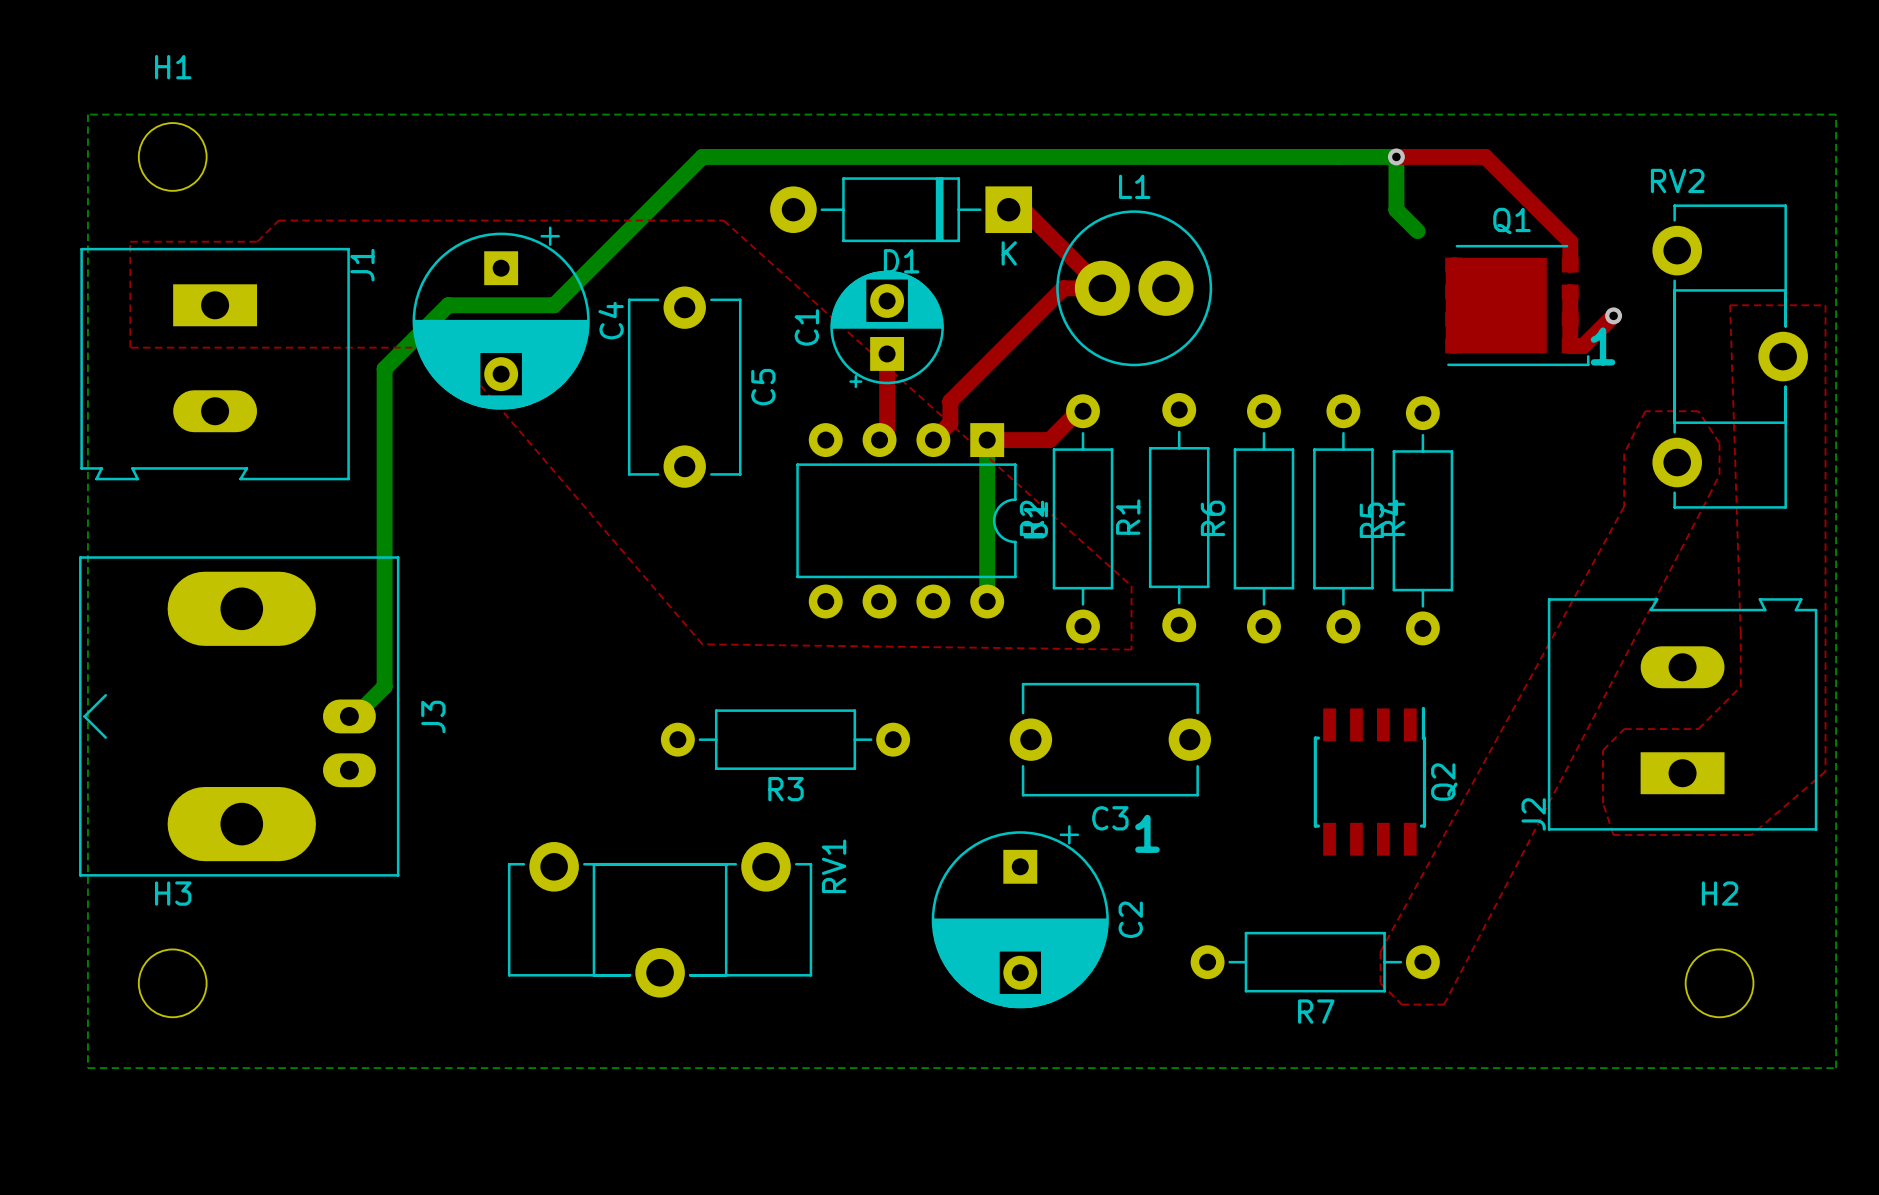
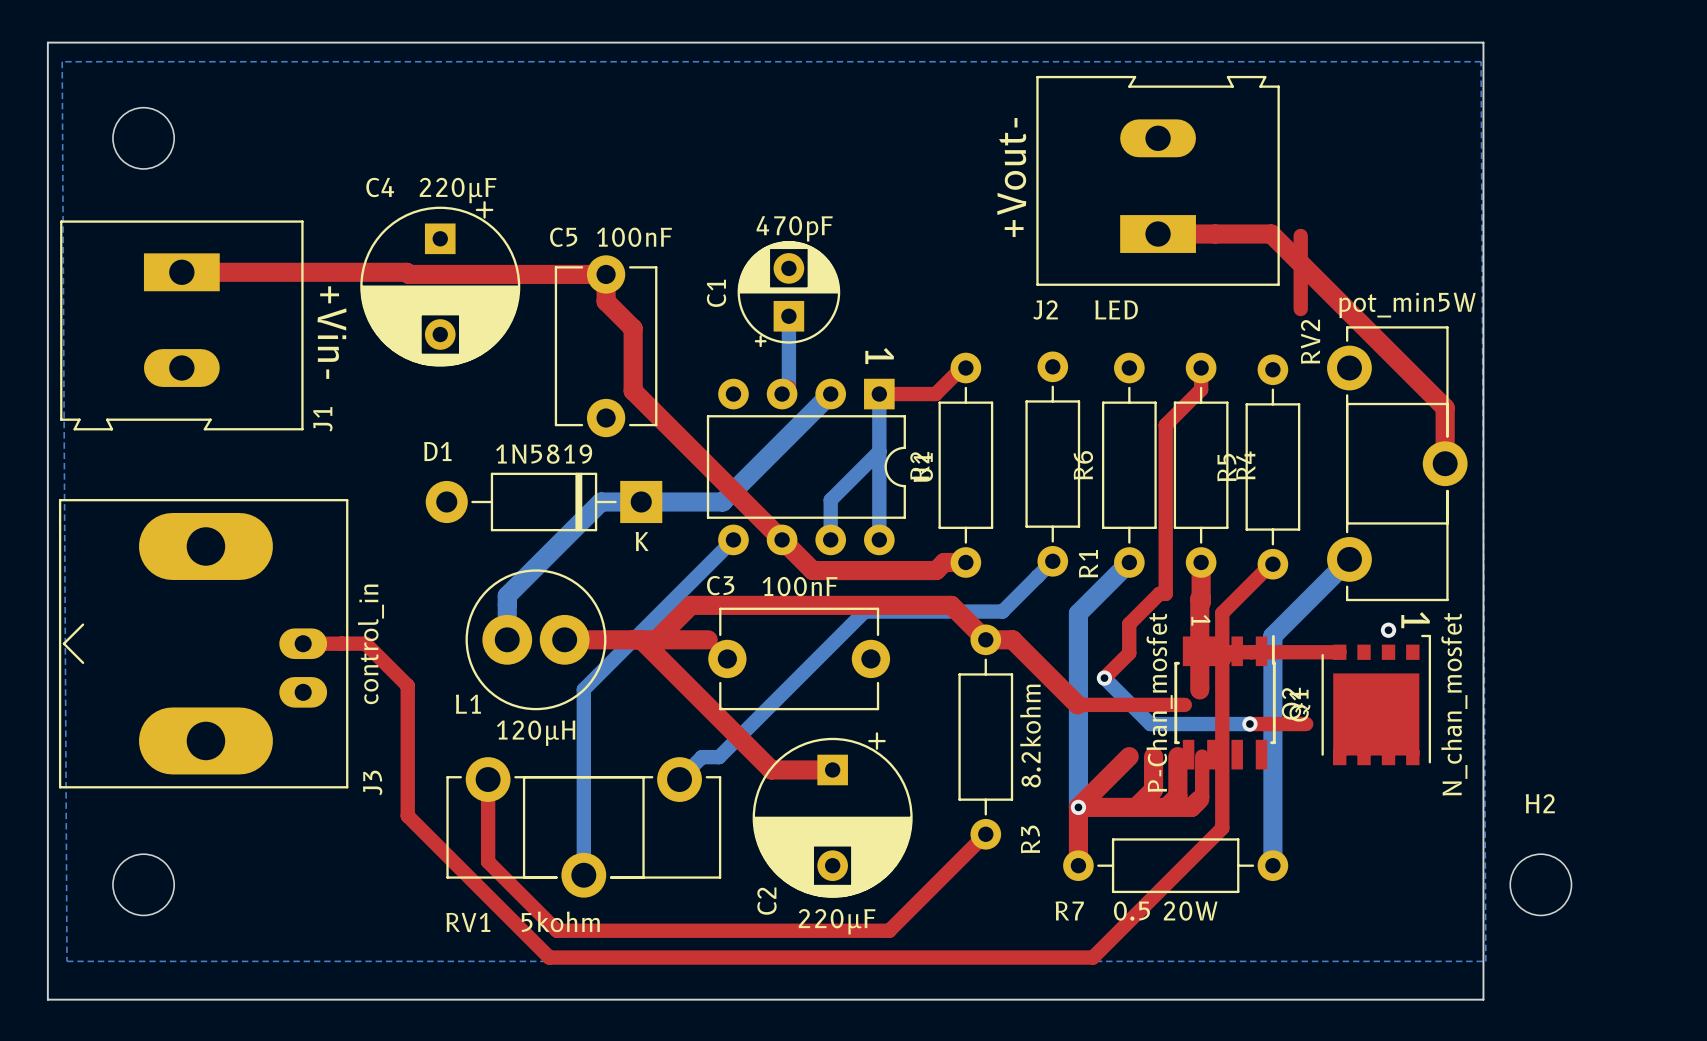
board edge: none -> (47, 42) (47, 999) (1483, 999) (1483, 42) (47, 42)
H1 name: H1 (173, 67) -> none
top track: (1396, 156) (1485, 156) (1570, 241) (1570, 265) -> none
via: (1396, 156) -> none
RV2 name rotation: 0° (1677, 180) -> 90° counterclockwise (1310, 341)
L1 name position: L1 (1134, 186) -> L1 (468, 704)
text: none -> +Vout- (1011, 177)
D1 position: (901, 209) -> (544, 501)
top track: (1008, 209) (1023, 209) (1102, 288) (1063, 288) (950, 401) (950, 423) (933, 440) -> none
C4 value: none -> 220µF (458, 190)
top zone outline: (278, 220) (257, 241) (130, 241) (130, 347) (448, 347) (702, 644) (1131, 649) (1131, 586) (723, 220) (278, 220) -> none
bottom track: (1417, 231) (1396, 209) (1396, 156) (702, 156) (554, 305) (448, 305) (384, 368) (384, 686) (354, 716) -> none
C1 value: none -> 470pF (794, 228)
D1 name position: D1 (901, 261) -> D1 (437, 451)
top track: none -> (1158, 234) (1271, 234) (1445, 407) (1445, 463)
J1 name position: J1 (362, 265) -> J1 (322, 419)
C5 value: none -> 100nF (634, 237)
L1 position: (1134, 288) -> (535, 639)
top track: (1570, 291) (1570, 345) (1583, 345) (1613, 315) -> none
top track: none -> (181, 272) (606, 274) (606, 301) (633, 328) (633, 390) (812, 570) (936, 570) (944, 562) (965, 562)
Q1 rotation: 0° (1517, 305) -> 90° counterclockwise (1376, 700)
Q1 position: (1517, 305) -> (1376, 700)
top zone outline: (1730, 305) (1825, 305) (1825, 771) (1751, 835) (1613, 835) (1603, 803) (1603, 750) (1624, 729) (1698, 729) (1740, 686) (1730, 305) -> none
via: (1613, 315) -> none
C4 name rotation: 0° (611, 320) -> 90° clockwise (380, 187)
C4 name position: C4 (611, 320) -> C4 (380, 187)
RV2 value: none -> pot_min5W (1407, 305)
J2 value: none -> LED (1116, 309)
text: 1 (1603, 346) -> none
top track: (887, 353) (887, 432) -> none
bottom track: none -> (788, 316) (788, 387)
RV2 position: (1730, 356) -> (1397, 463)
text: none -> +Vin- (332, 332)
C5 name rotation: 0° (763, 387) -> 90° clockwise (563, 237)
C5 name position: C5 (763, 387) -> C5 (563, 237)
text: none -> 1 (879, 356)
top track: none -> (1201, 368) (1201, 389) (1165, 425) (1165, 593) (1159, 593) (1129, 624) (1129, 653) (1104, 678)
top zone outline: (1645, 411) (1698, 411) (1719, 443) (1719, 474) (1444, 1004) (1401, 1004) (1380, 983) (1380, 951) (1624, 506) (1624, 453) (1645, 411) -> none
bottom track: none -> (830, 394) (722, 501) (601, 501) (507, 595) (507, 639)
bottom track: none -> (879, 451) (830, 500) (830, 539)
D1 value: none -> 1N5819 (544, 454)
R1 name position: R1 (1128, 517) -> R1 (1088, 563)
bottom track: none -> (733, 539) (583, 689) (583, 875)
bottom track: none -> (1349, 559) (1272, 635) (1272, 865)
bottom track: none -> (1052, 561) (1002, 611) (864, 611) (719, 757) (701, 757) (679, 779)
bottom track: none -> (1129, 562) (1078, 613) (1078, 807)
top track: none -> (1272, 562) (1222, 613) (1222, 828) (1092, 957) (549, 957) (407, 815) (407, 685) (365, 643) (308, 643)
C3 value: none -> 100nF (800, 586)
top track: none -> (1201, 602) (1201, 562) (1199, 689) (1202, 687)
text: none -> 1 (1200, 620)
text: none -> 1 (1415, 620)
via: none -> (1388, 630)
top track: none -> (564, 639) (708, 639) (564, 639)
top track: none -> (641, 639) (771, 769) (832, 769)
top track: none -> (656, 639) (691, 605) (951, 605) (985, 639) (1012, 639) (1077, 704) (1184, 704)
J2 position: (1682, 714) -> (1158, 180)
J3 value: none -> control_in (370, 644)
J3 name position: J3 (433, 716) -> J3 (372, 782)
top track: none -> (1339, 652) (1230, 652) (1222, 660)
R3 rotation: 0° (785, 739) -> 90° clockwise (985, 737)
R3 position: (785, 739) -> (985, 737)
C3 position: (1110, 739) -> (799, 658)
bottom track: none -> (1104, 678) (1150, 724) (1249, 724)
via: none -> (1104, 678)
Q2 value: none -> P-Chan_mosfet (1159, 702)
Q1 value: none -> N_chan_mosfet (1454, 704)
R3 name position: R3 (786, 789) -> R3 (1030, 839)
top track: none -> (1249, 724) (1306, 724)
via: none -> (1249, 724)
J2 name rotation: 0° (1533, 814) -> 90° clockwise (1045, 309)
J2 name position: J2 (1533, 814) -> J2 (1045, 309)
L1 value: none -> 120µH (536, 733)
C3 name position: C3 (1110, 818) -> C3 (720, 585)
R3 value: none -> 8.2kohm (1030, 736)
text: 1 (1147, 833) -> none
top track: none -> (1129, 756) (1078, 807)
top track: none -> (1153, 756) (1153, 789) (1135, 807)
top track: none -> (1177, 756) (1177, 796) (1166, 807)
top track: none -> (1202, 756) (1202, 796) (1191, 807) (1078, 807)
top track: none -> (488, 776) (488, 861) (557, 930) (889, 930) (985, 834)
RV1 name rotation: 0° (834, 866) -> 90° clockwise (468, 922)
RV1 name position: RV1 (834, 866) -> RV1 (468, 922)
H3 name: H3 (173, 893) -> none
top track: none -> (1078, 807) (1078, 865)
via: none -> (1078, 807)
C2 position: (1020, 916) -> (832, 815)
C2 name position: C2 (1130, 919) -> C2 (766, 901)
R7 name position: R7 (1316, 1011) -> R7 (1069, 910)
R7 value: none -> 0.5 20W (1165, 911)
RV1 value: none -> 5kohm (560, 921)
C2 value: none -> 220µF (837, 921)
bottom zone outline: (87, 1068) (87, 114) (1836, 114) (1836, 1068) (1658, 1068) -> (67, 961) (62, 61) (1481, 61) (1485, 961)

